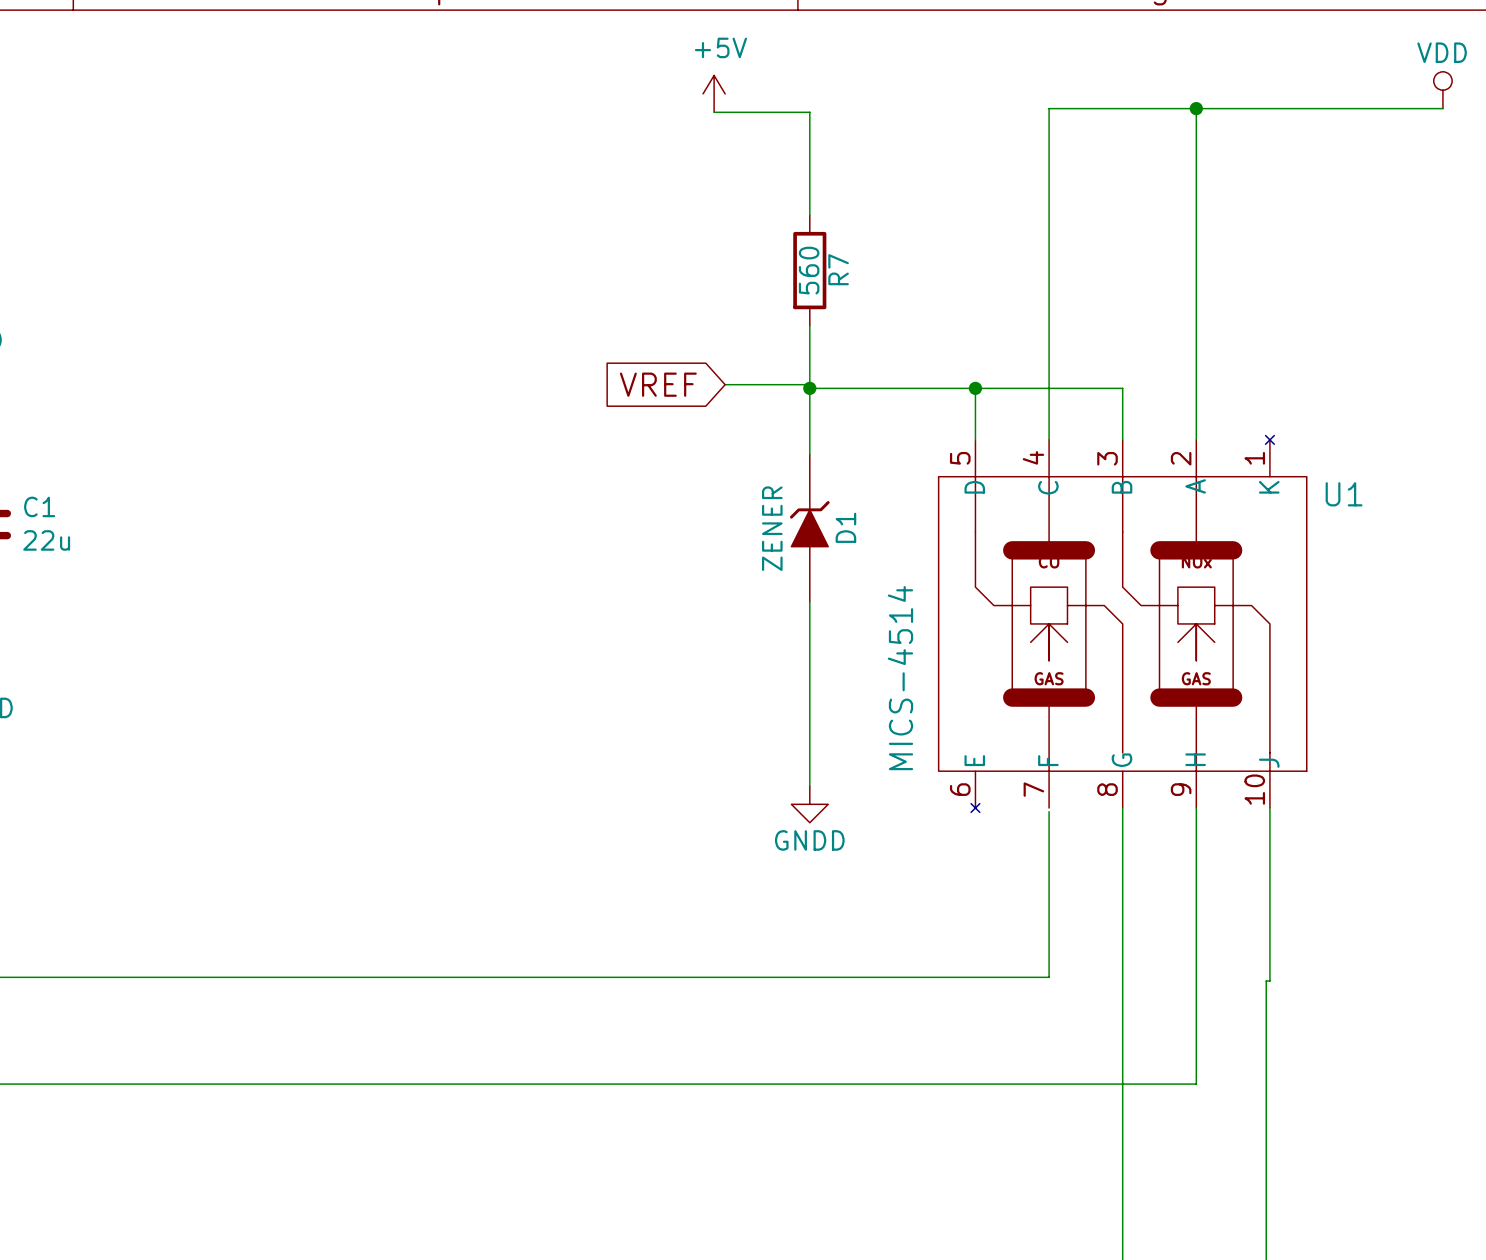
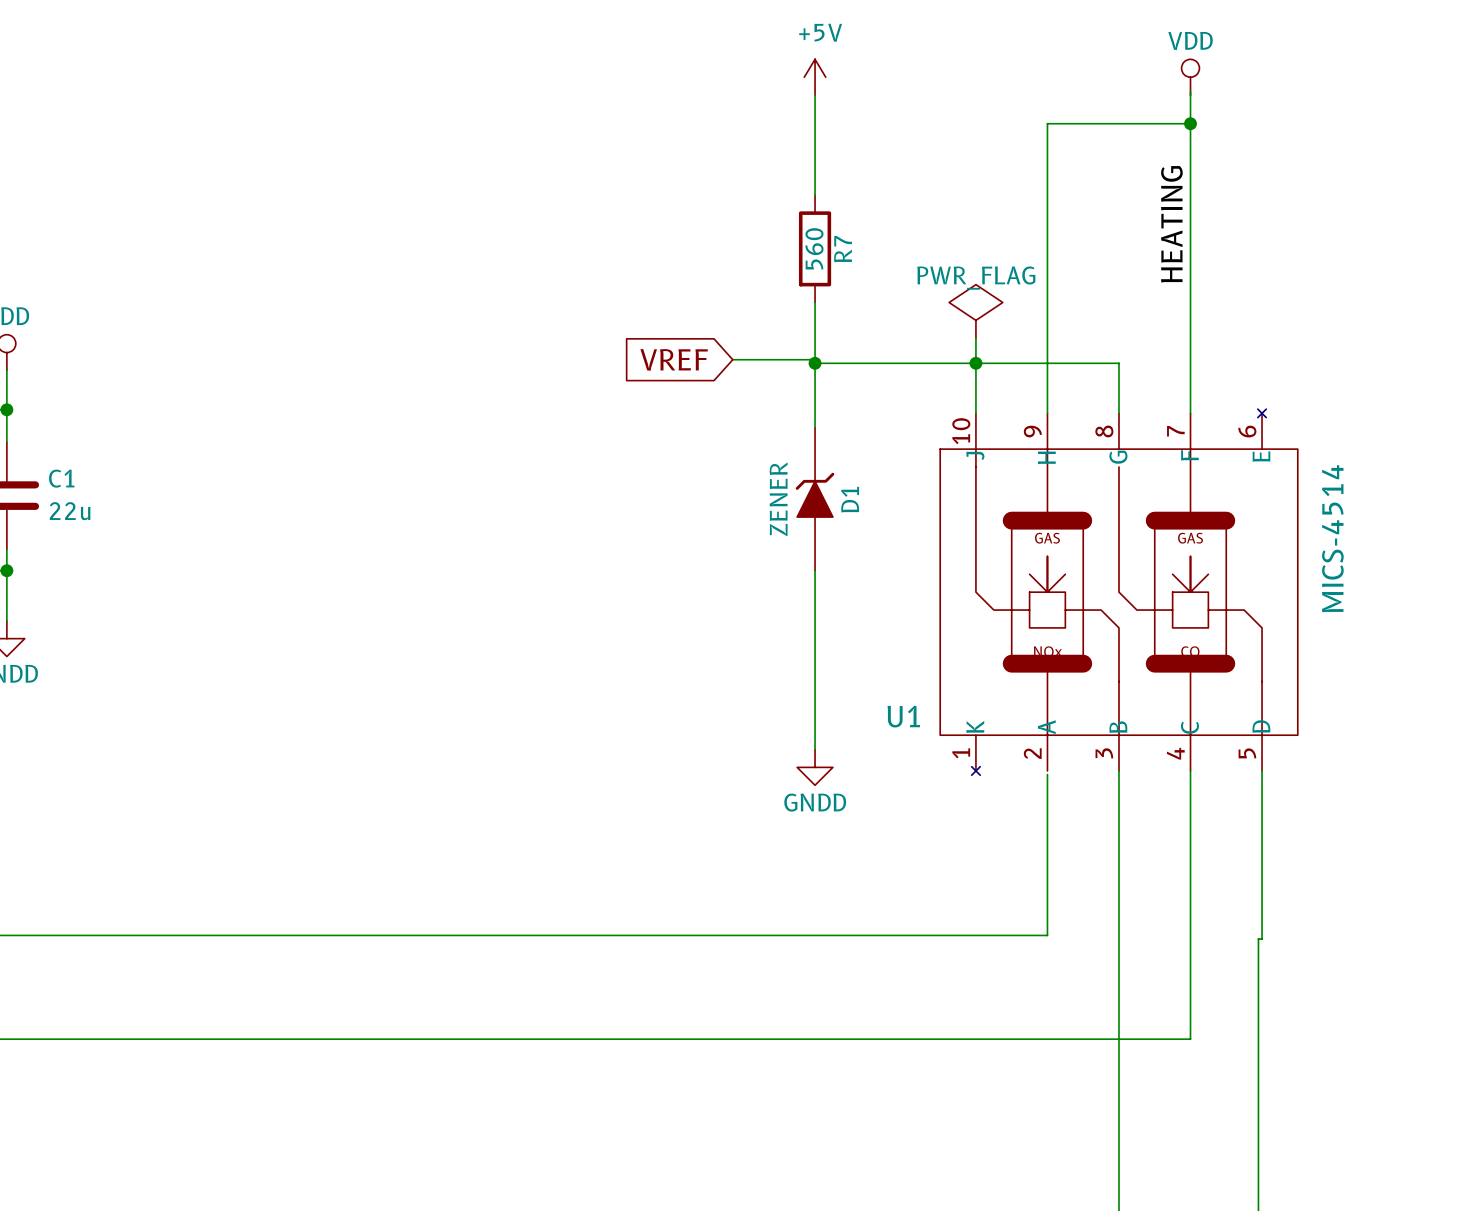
power symbol position: VDD (1442, 90) -> VDD (1190, 77)
power symbol position: +5V (714, 93) -> +5V (815, 77)
junction position: (1196, 108) -> (1190, 123)
wire: (1442, 108) (1049, 108) (1049, 141) -> (1190, 123) (1047, 123)
wire: (714, 112) (809, 112) -> none
label: none -> HEATING (1171, 224)
power symbol: none -> PWR_FLAG (975, 311)
wire: none -> (975, 338) (975, 363)
U1 rotation: 0° (1122, 623) -> 180° (1118, 592)

